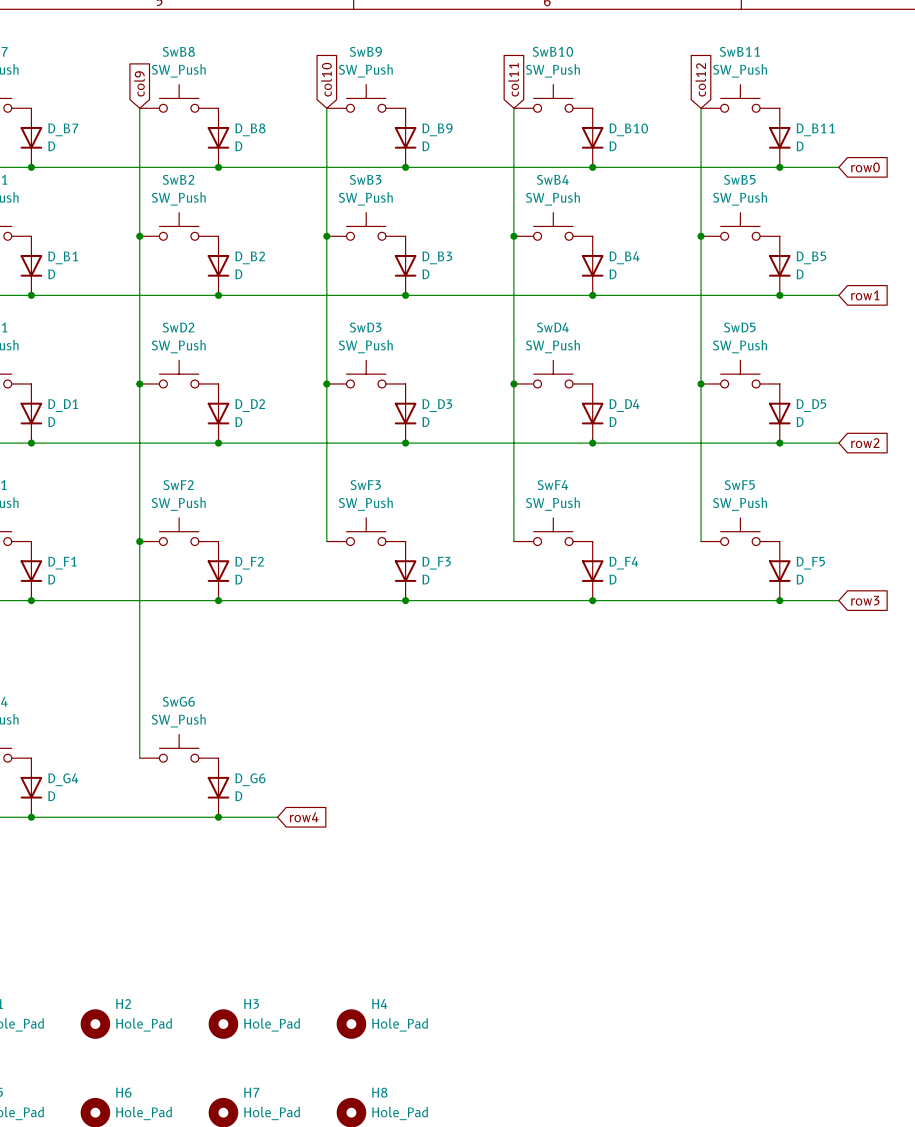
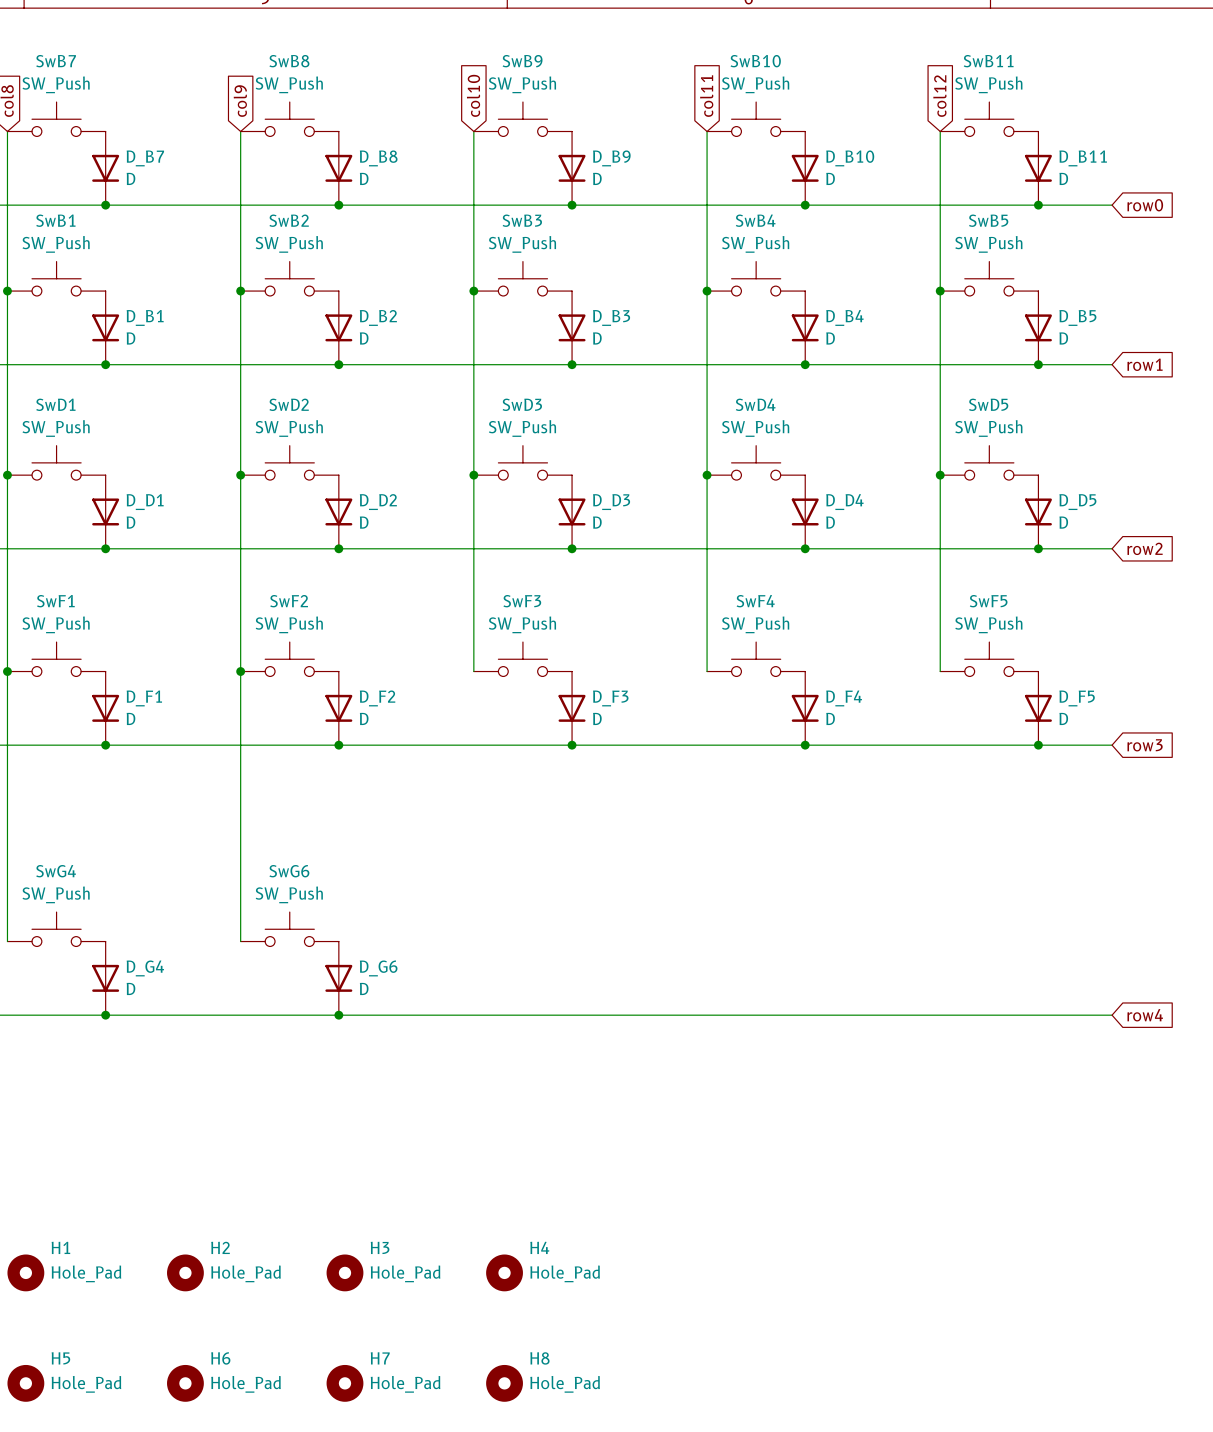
wire: none -> (412, 1015) (1112, 1015)
global label: row4 (304, 817) -> none
global label: none -> row4 (1145, 1015)

